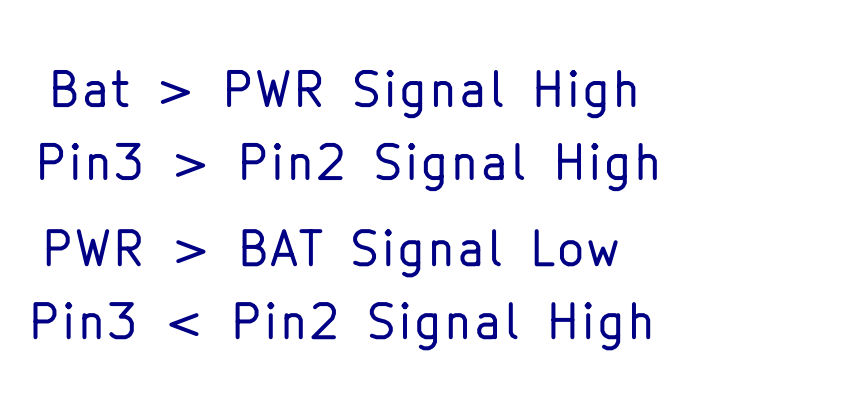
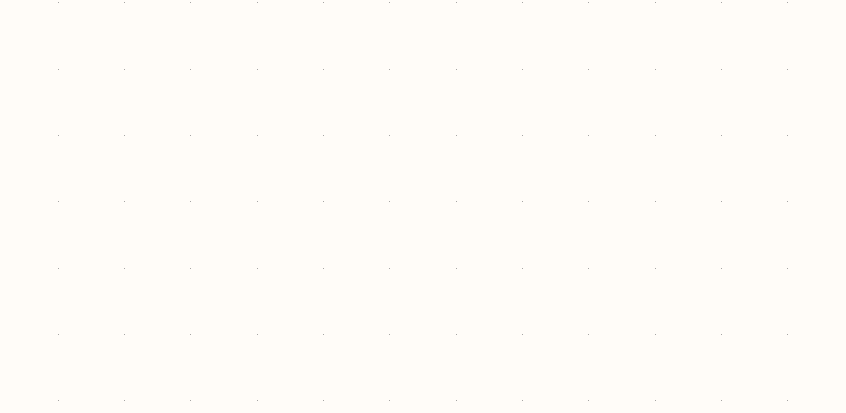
text: Bat > PWR Signal High (344, 94) -> none
text: Pin3 > Pin2 Signal High (348, 167) -> none
text: PWR > BAT Signal Low (332, 253) -> none
text: Pin3 < Pin2 Signal High (341, 326) -> none

